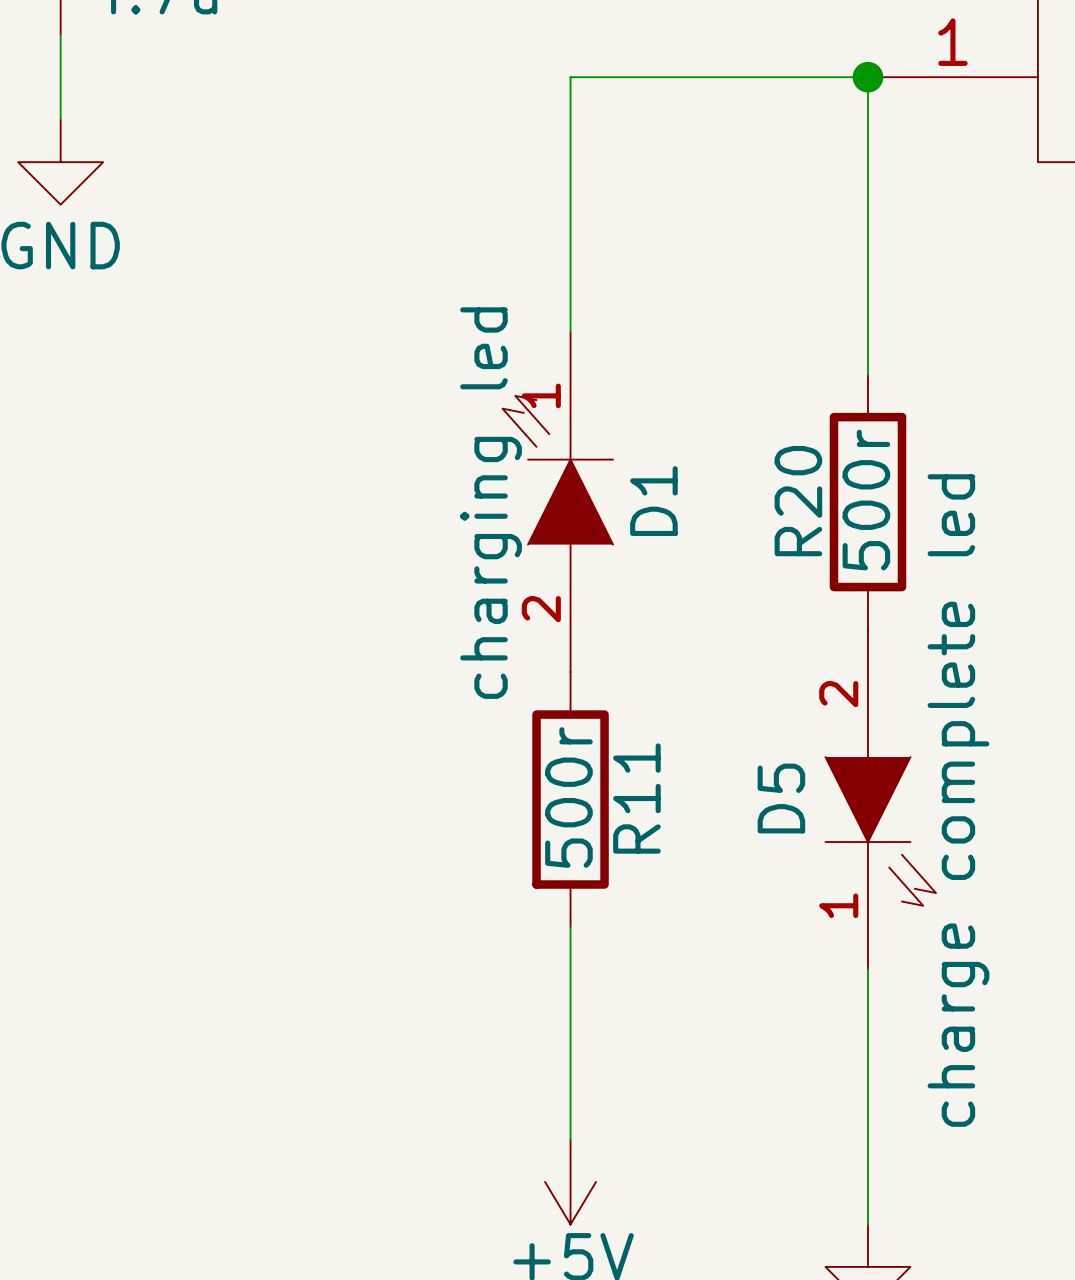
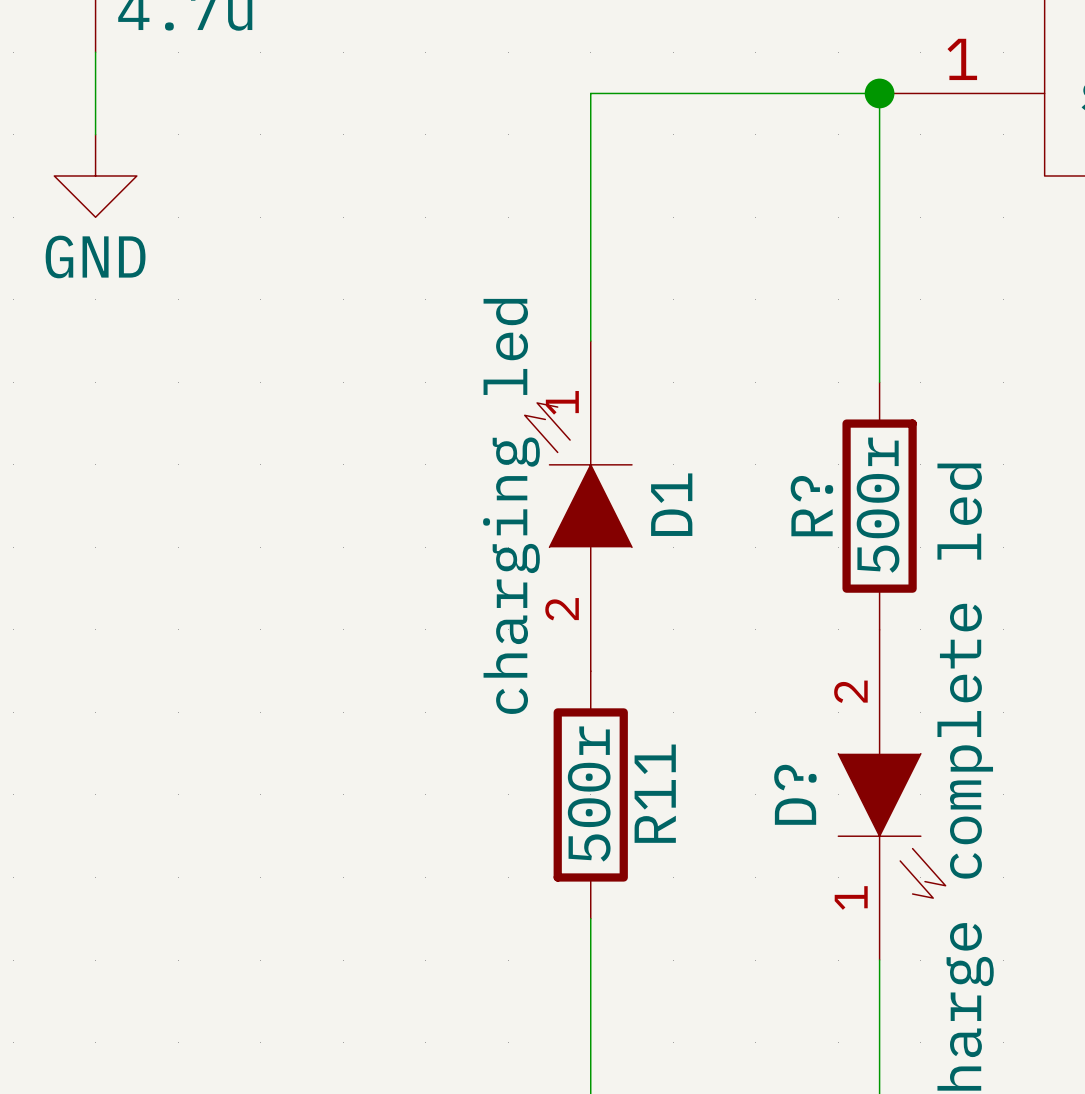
R20 name: R20 (798, 501) -> R? (811, 506)
D5 name: D5 (781, 798) -> D? (795, 794)

